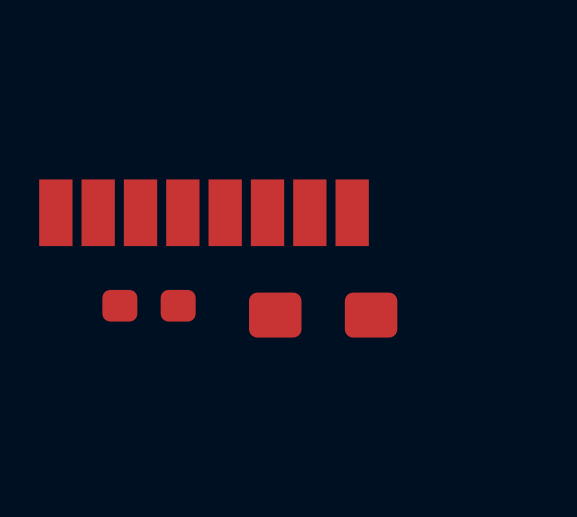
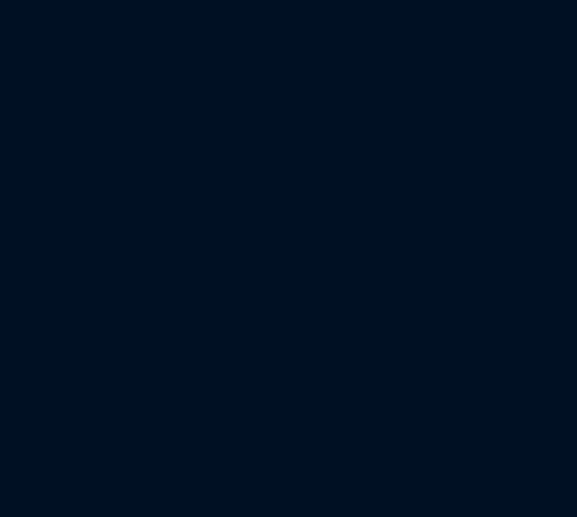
part: (204, 212) -> none
part: (149, 305) -> none
part: (323, 315) -> none

